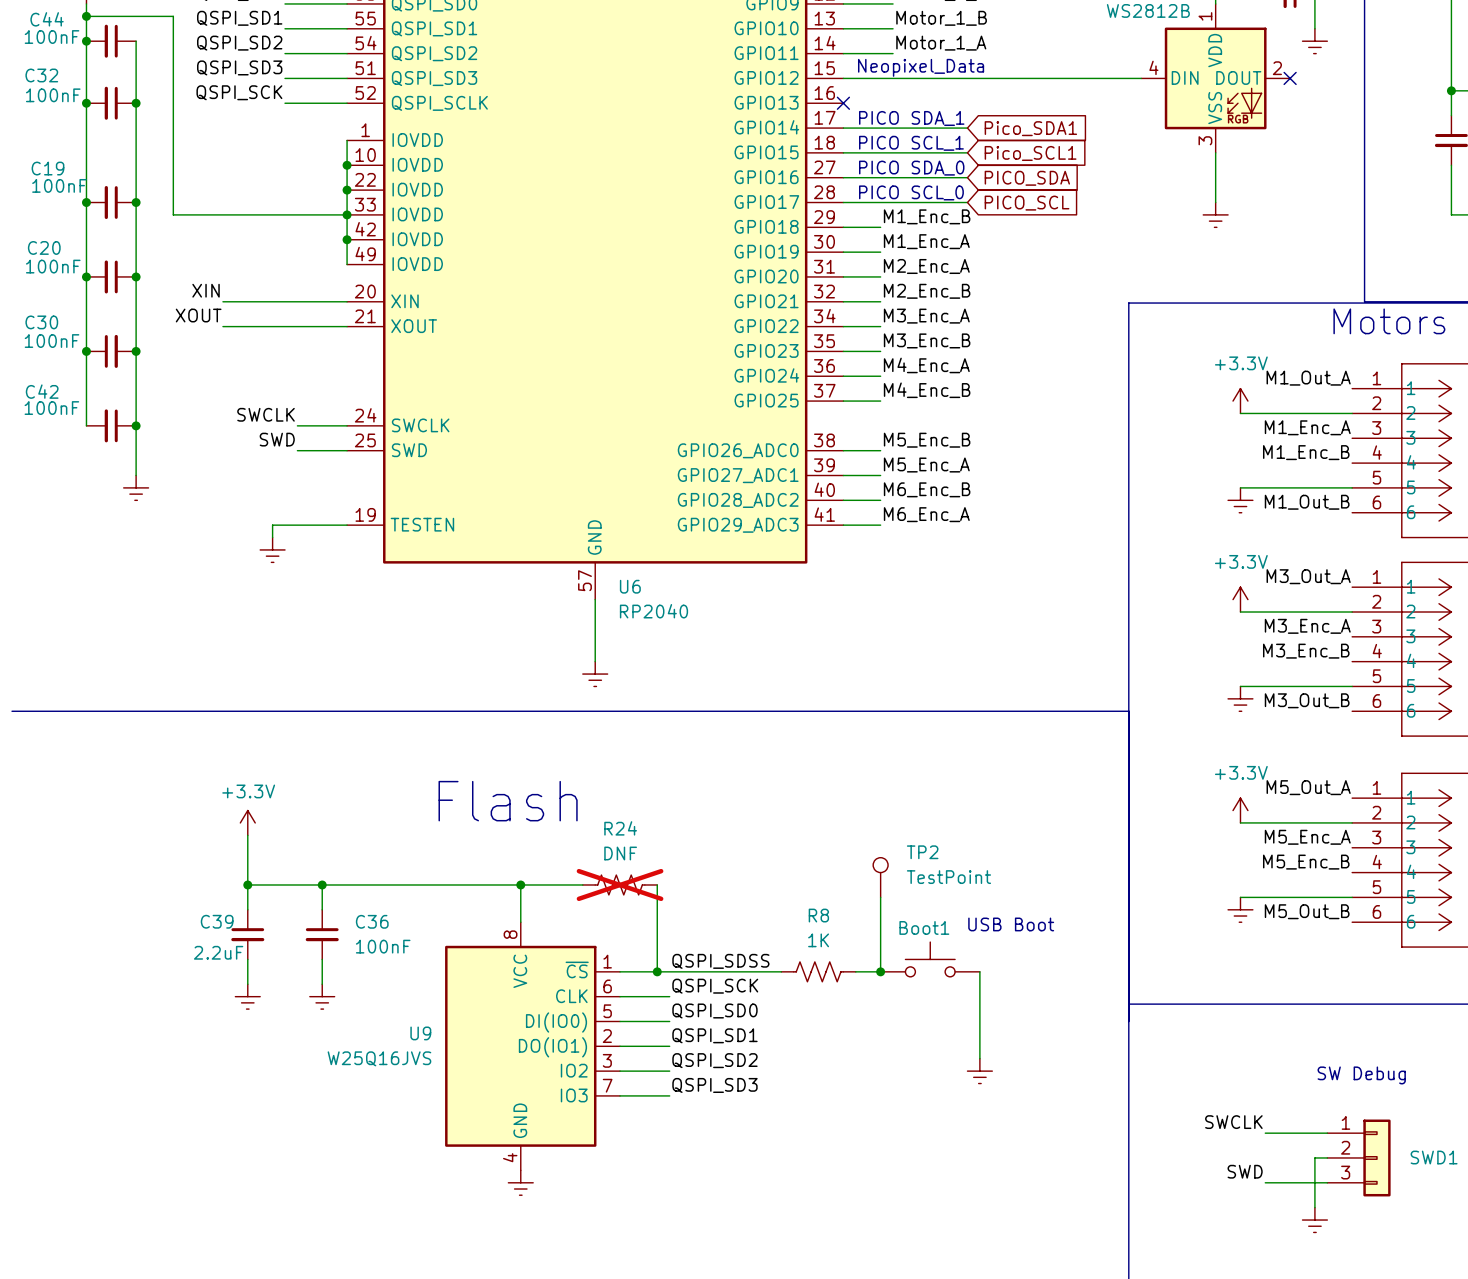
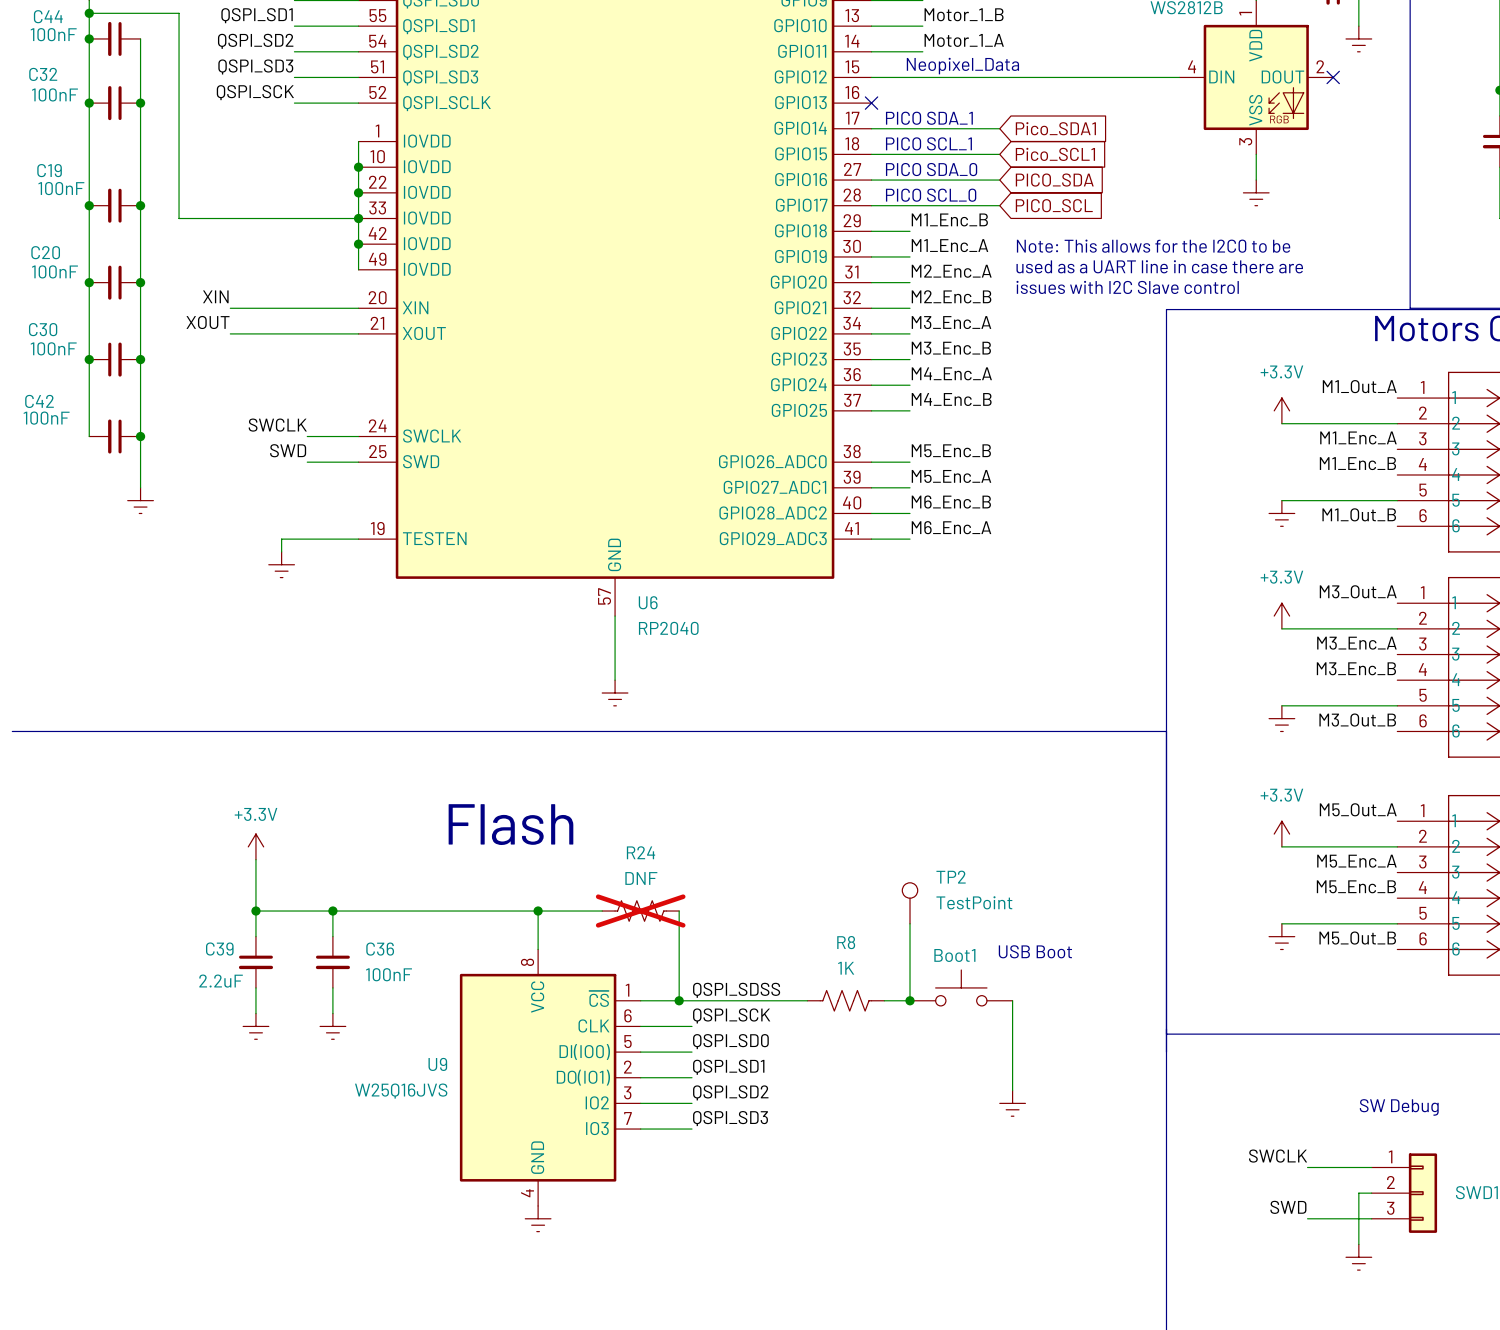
power symbol position: (1215, 214) -> (1256, 192)
text: none -> Note: This allows for the I2C0 to be (1153, 246)
text: none -> used as a UART line in case there are (1159, 266)
text: none -> issues with I2C Slave control (1127, 287)

